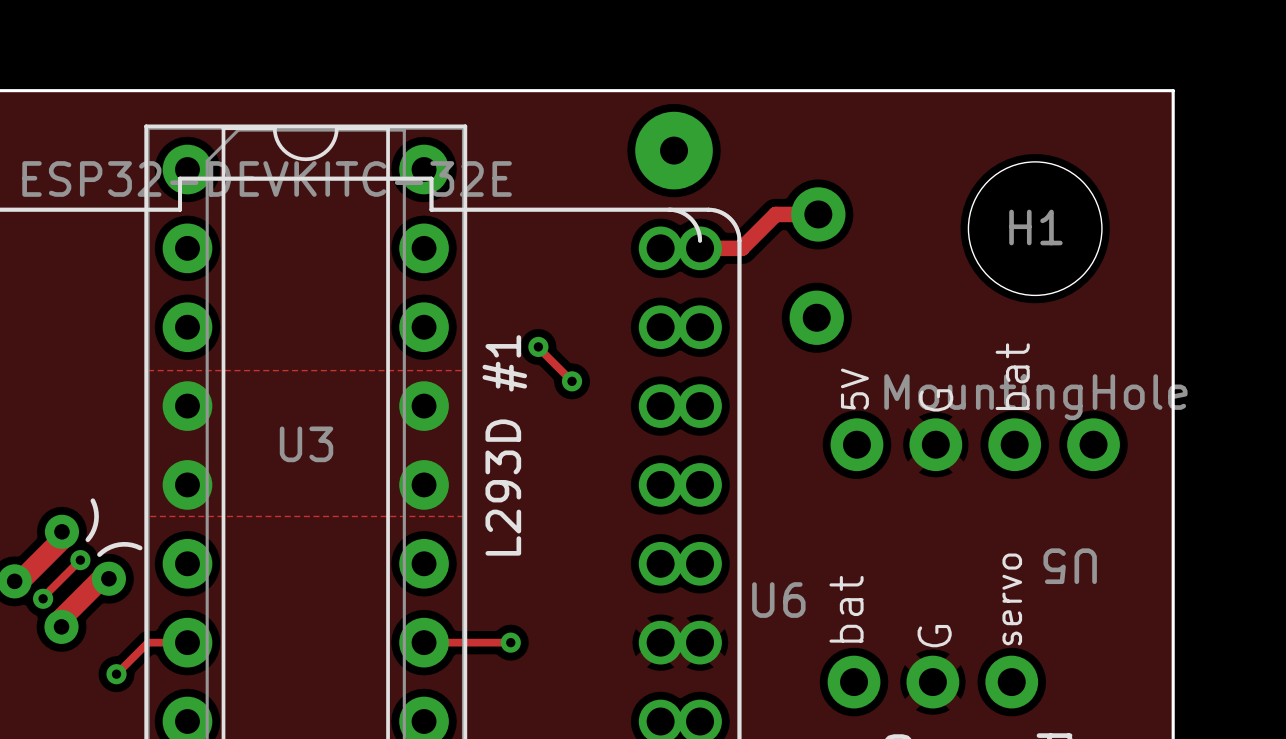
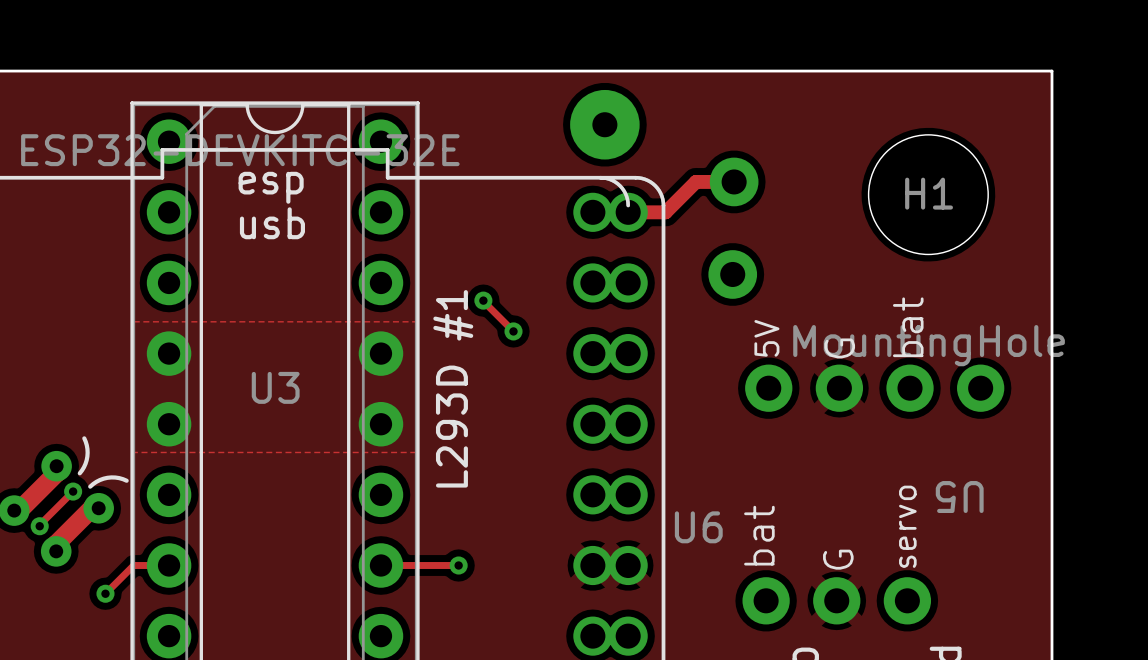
text: none -> esp (271, 187)
text: none -> usb (272, 223)

